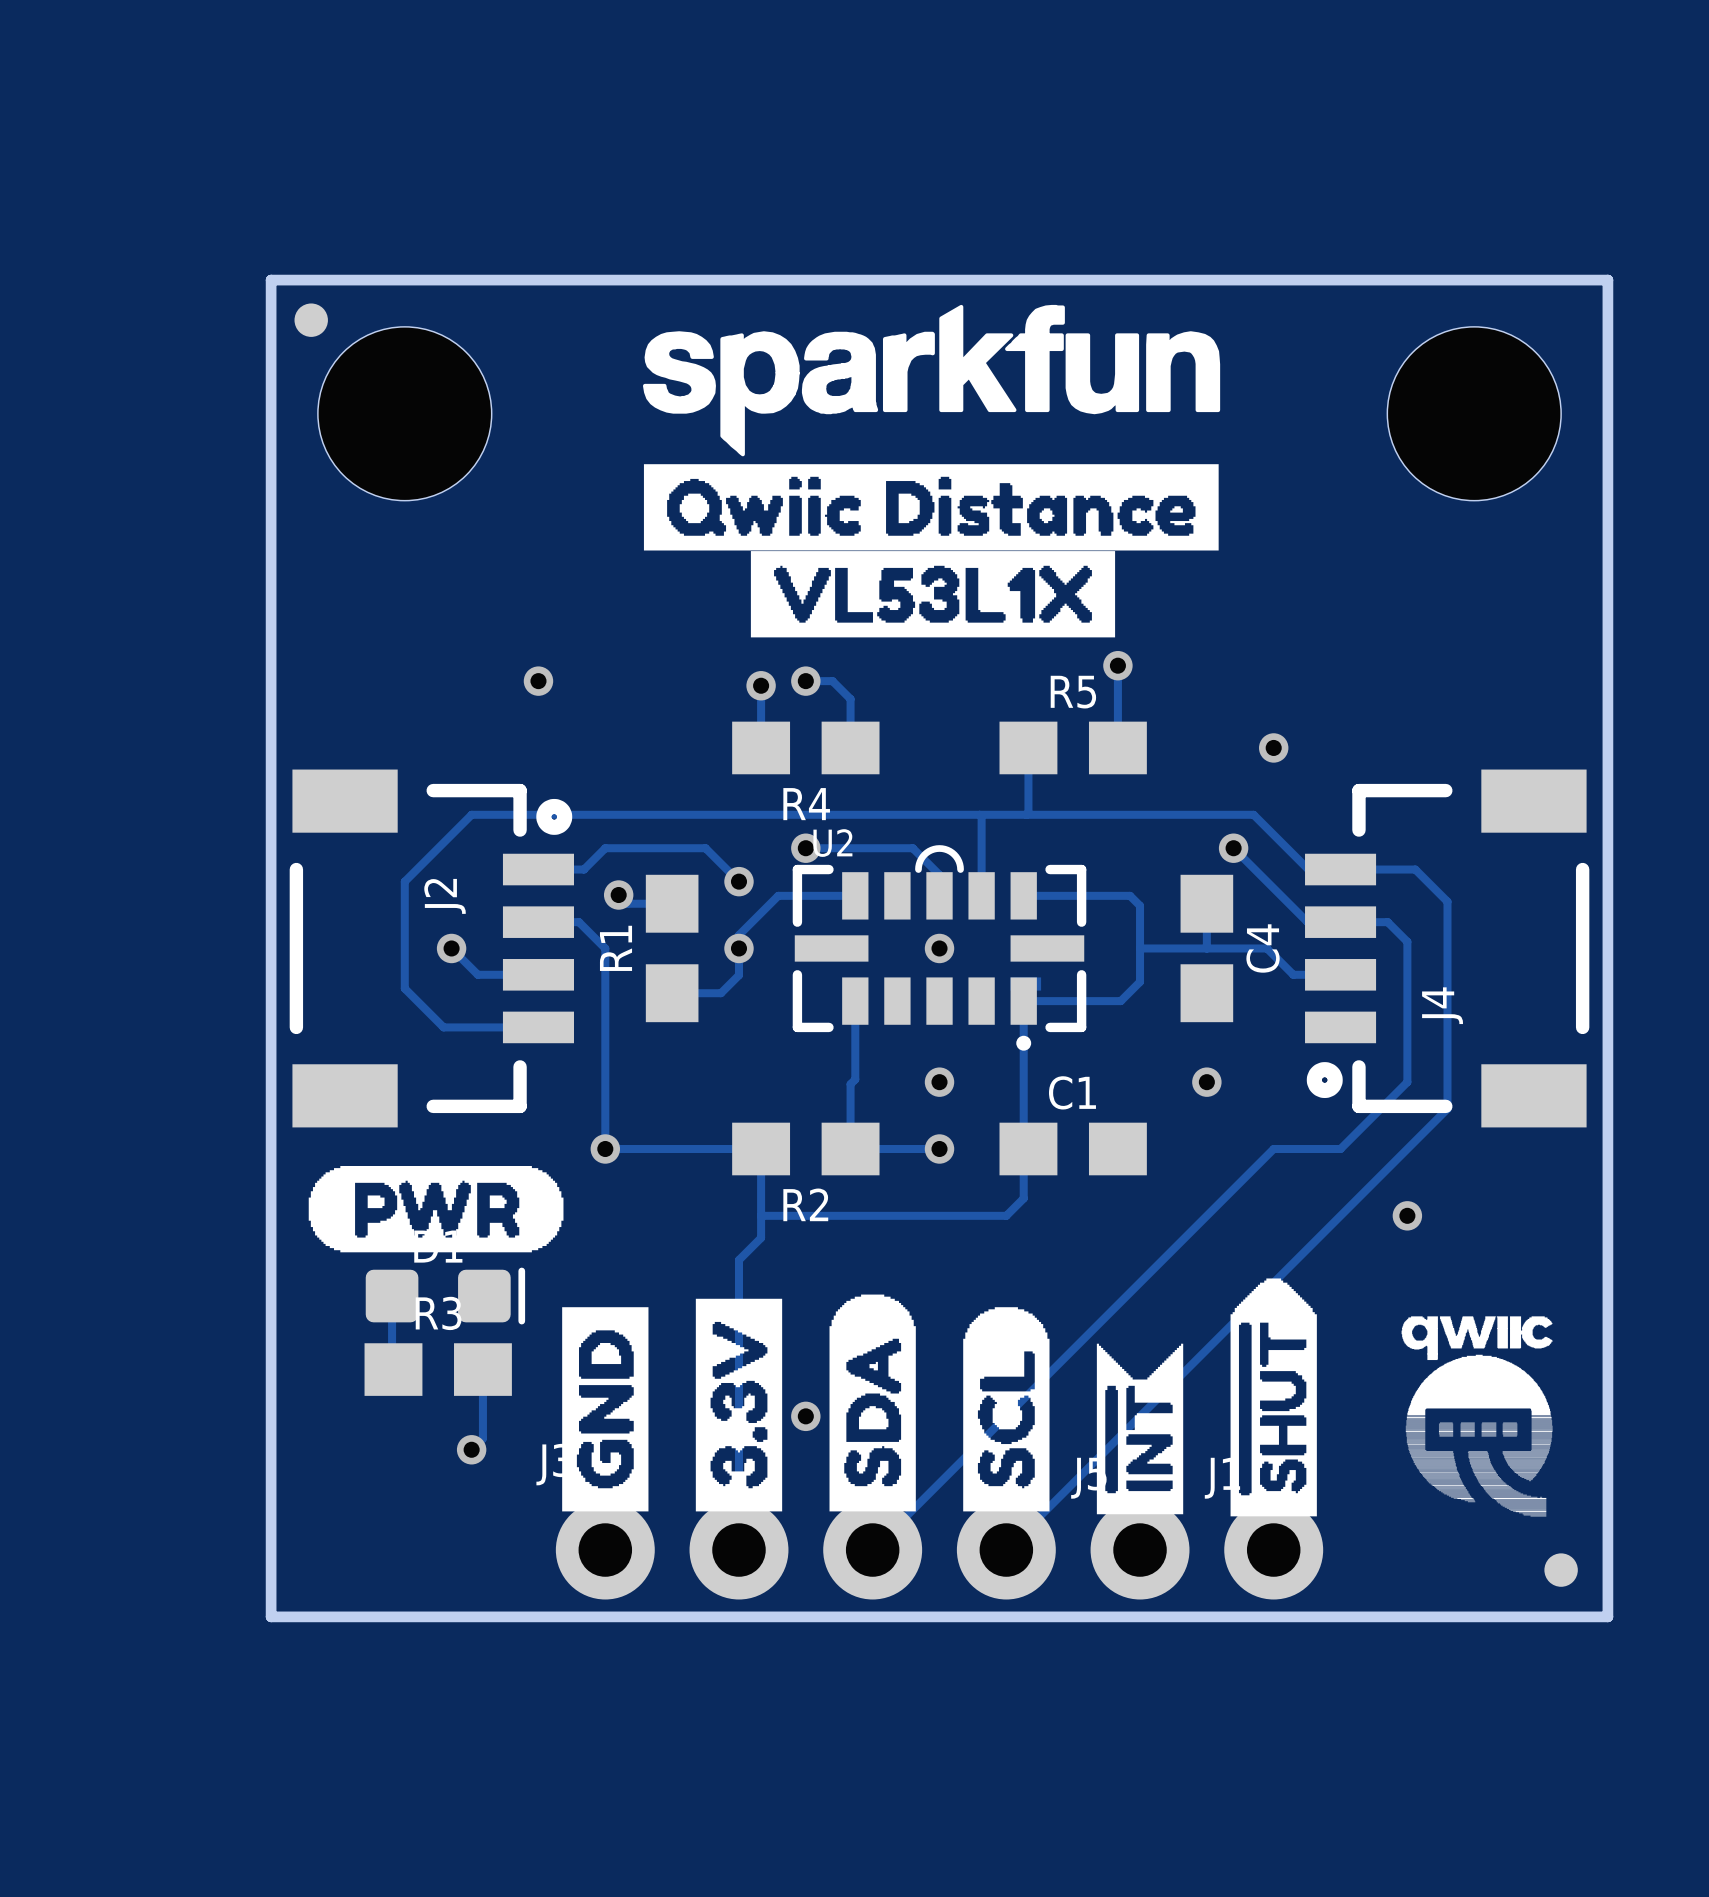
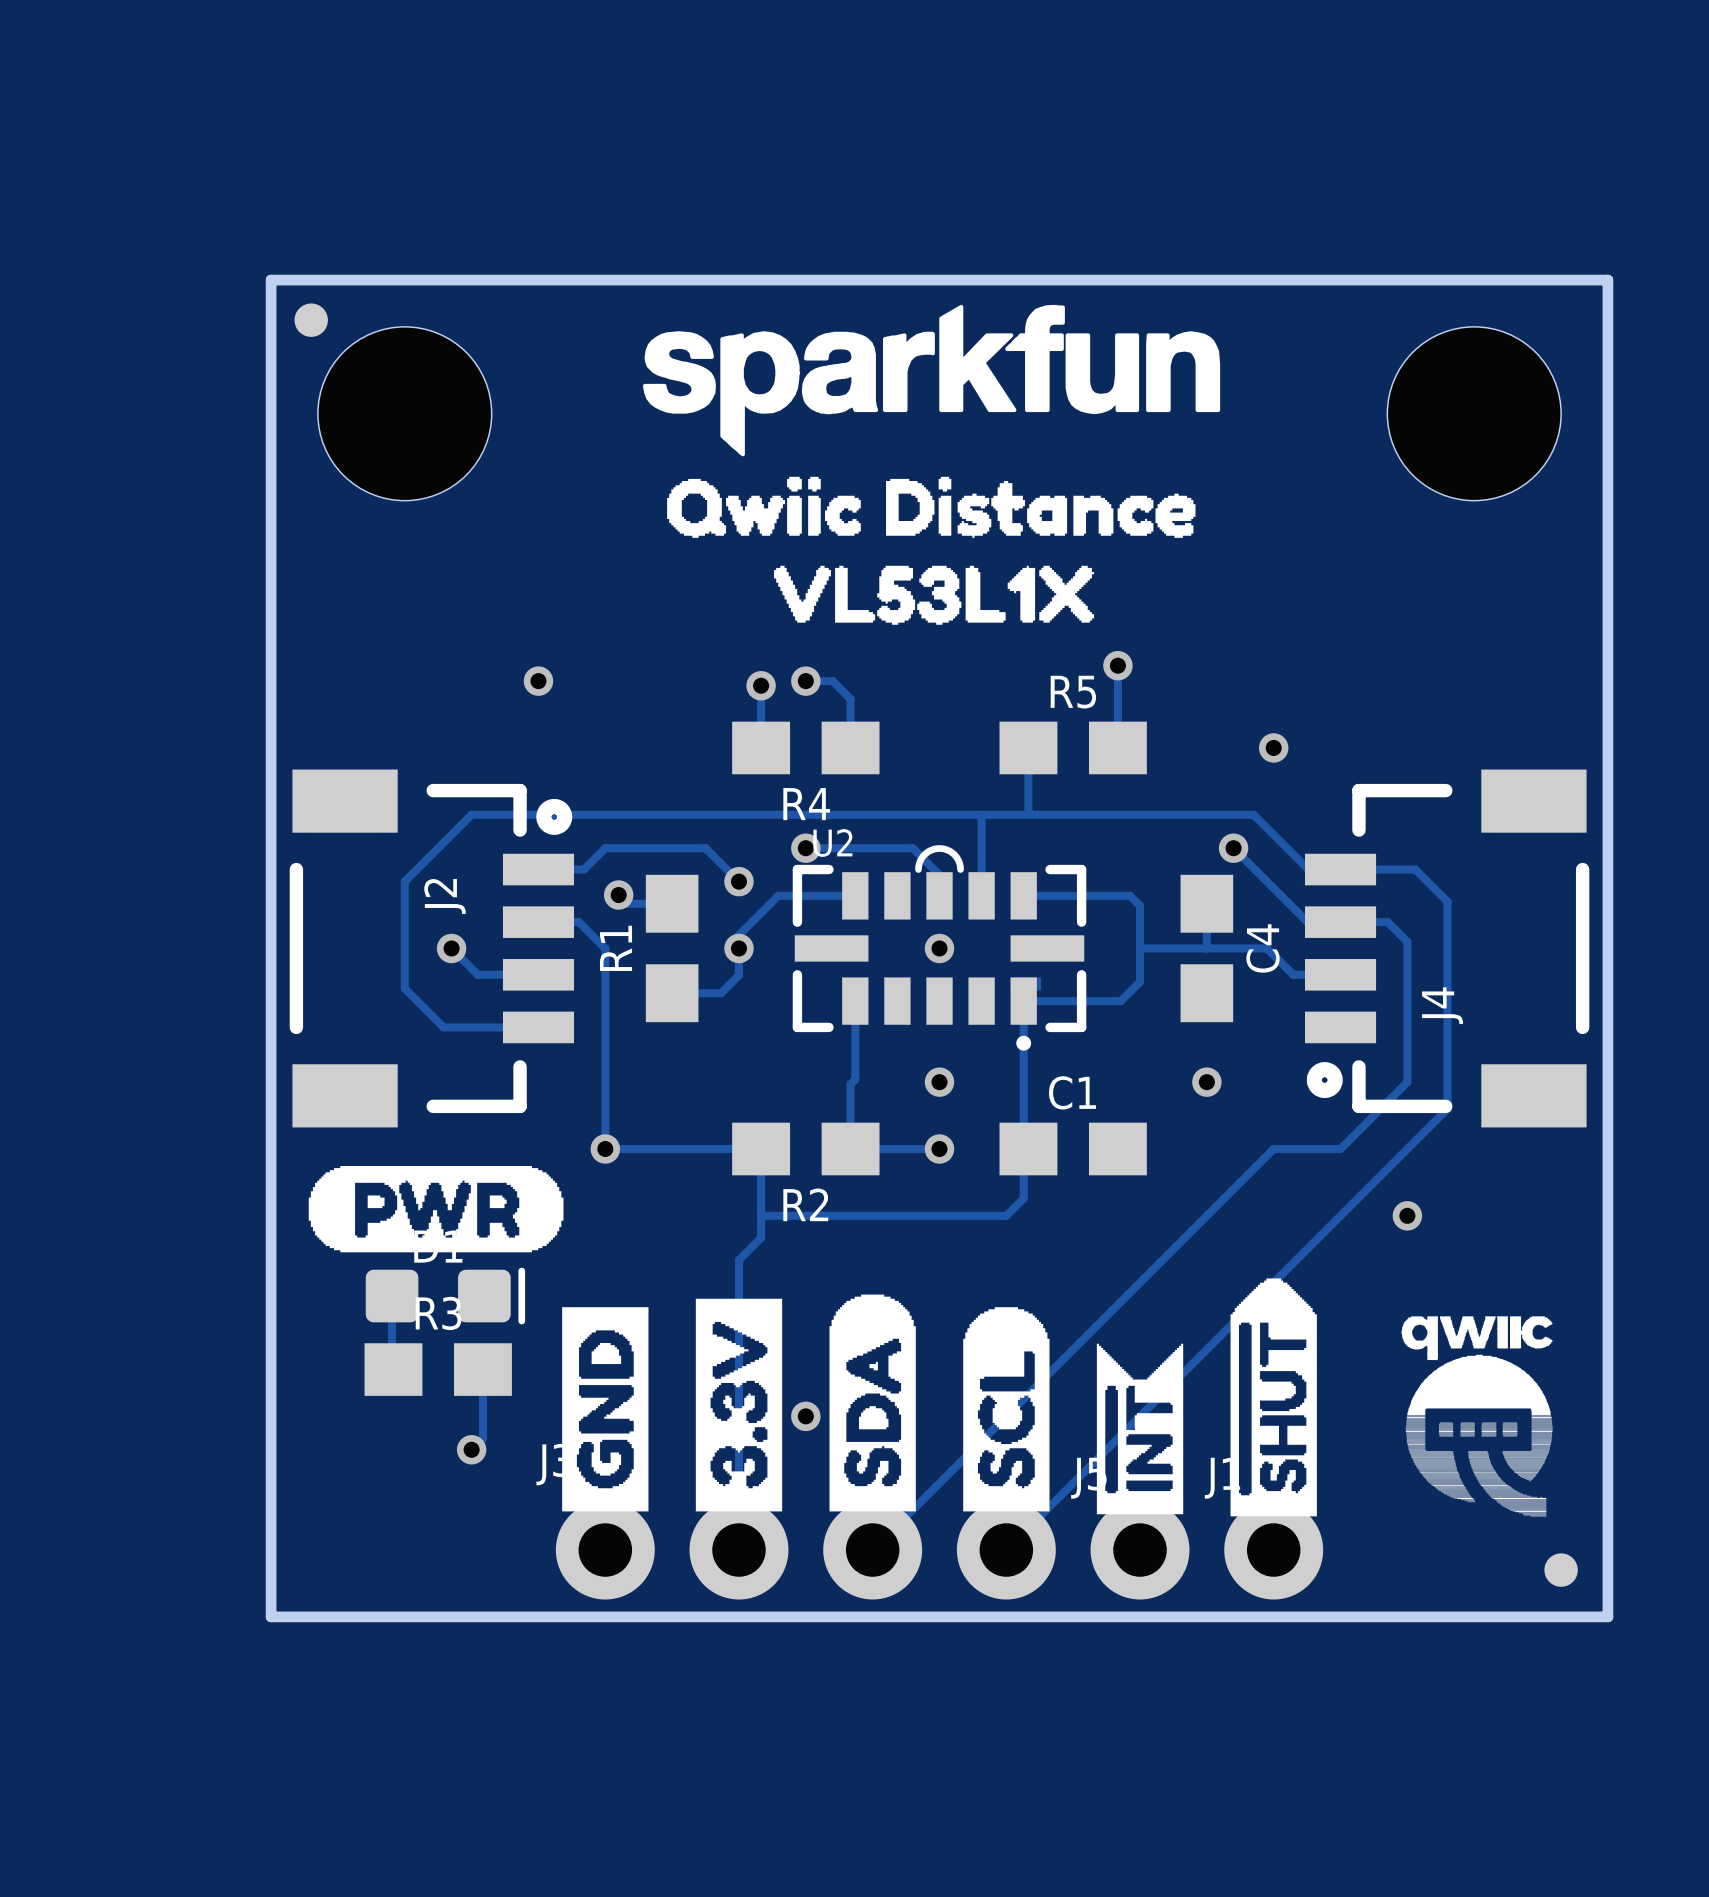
drawing shape: [643, 464, 1219, 551] -> [667, 476, 1196, 538]
drawing shape: [750, 551, 1116, 638] -> [774, 565, 1095, 625]

